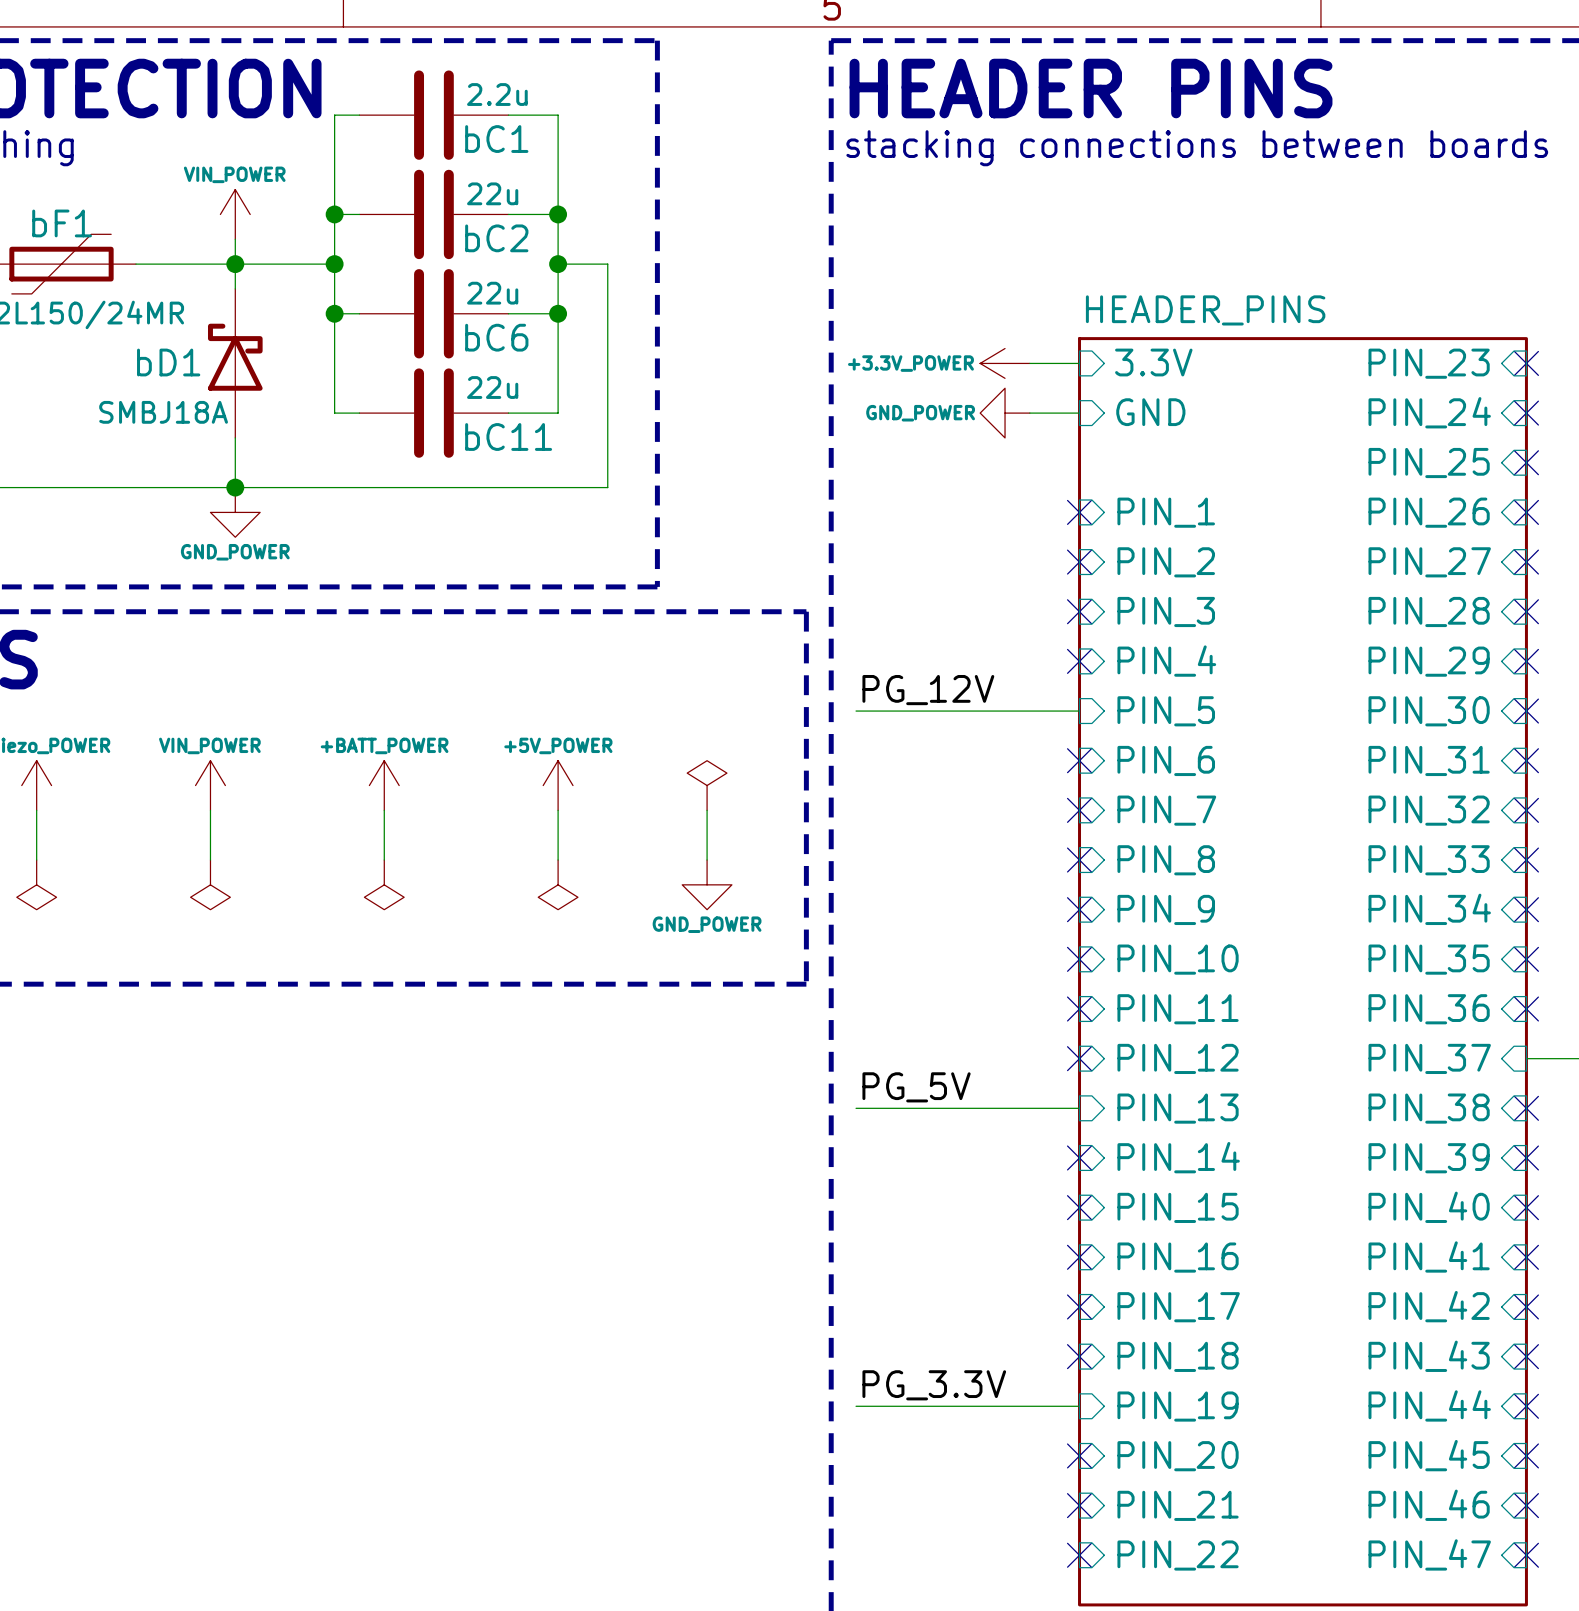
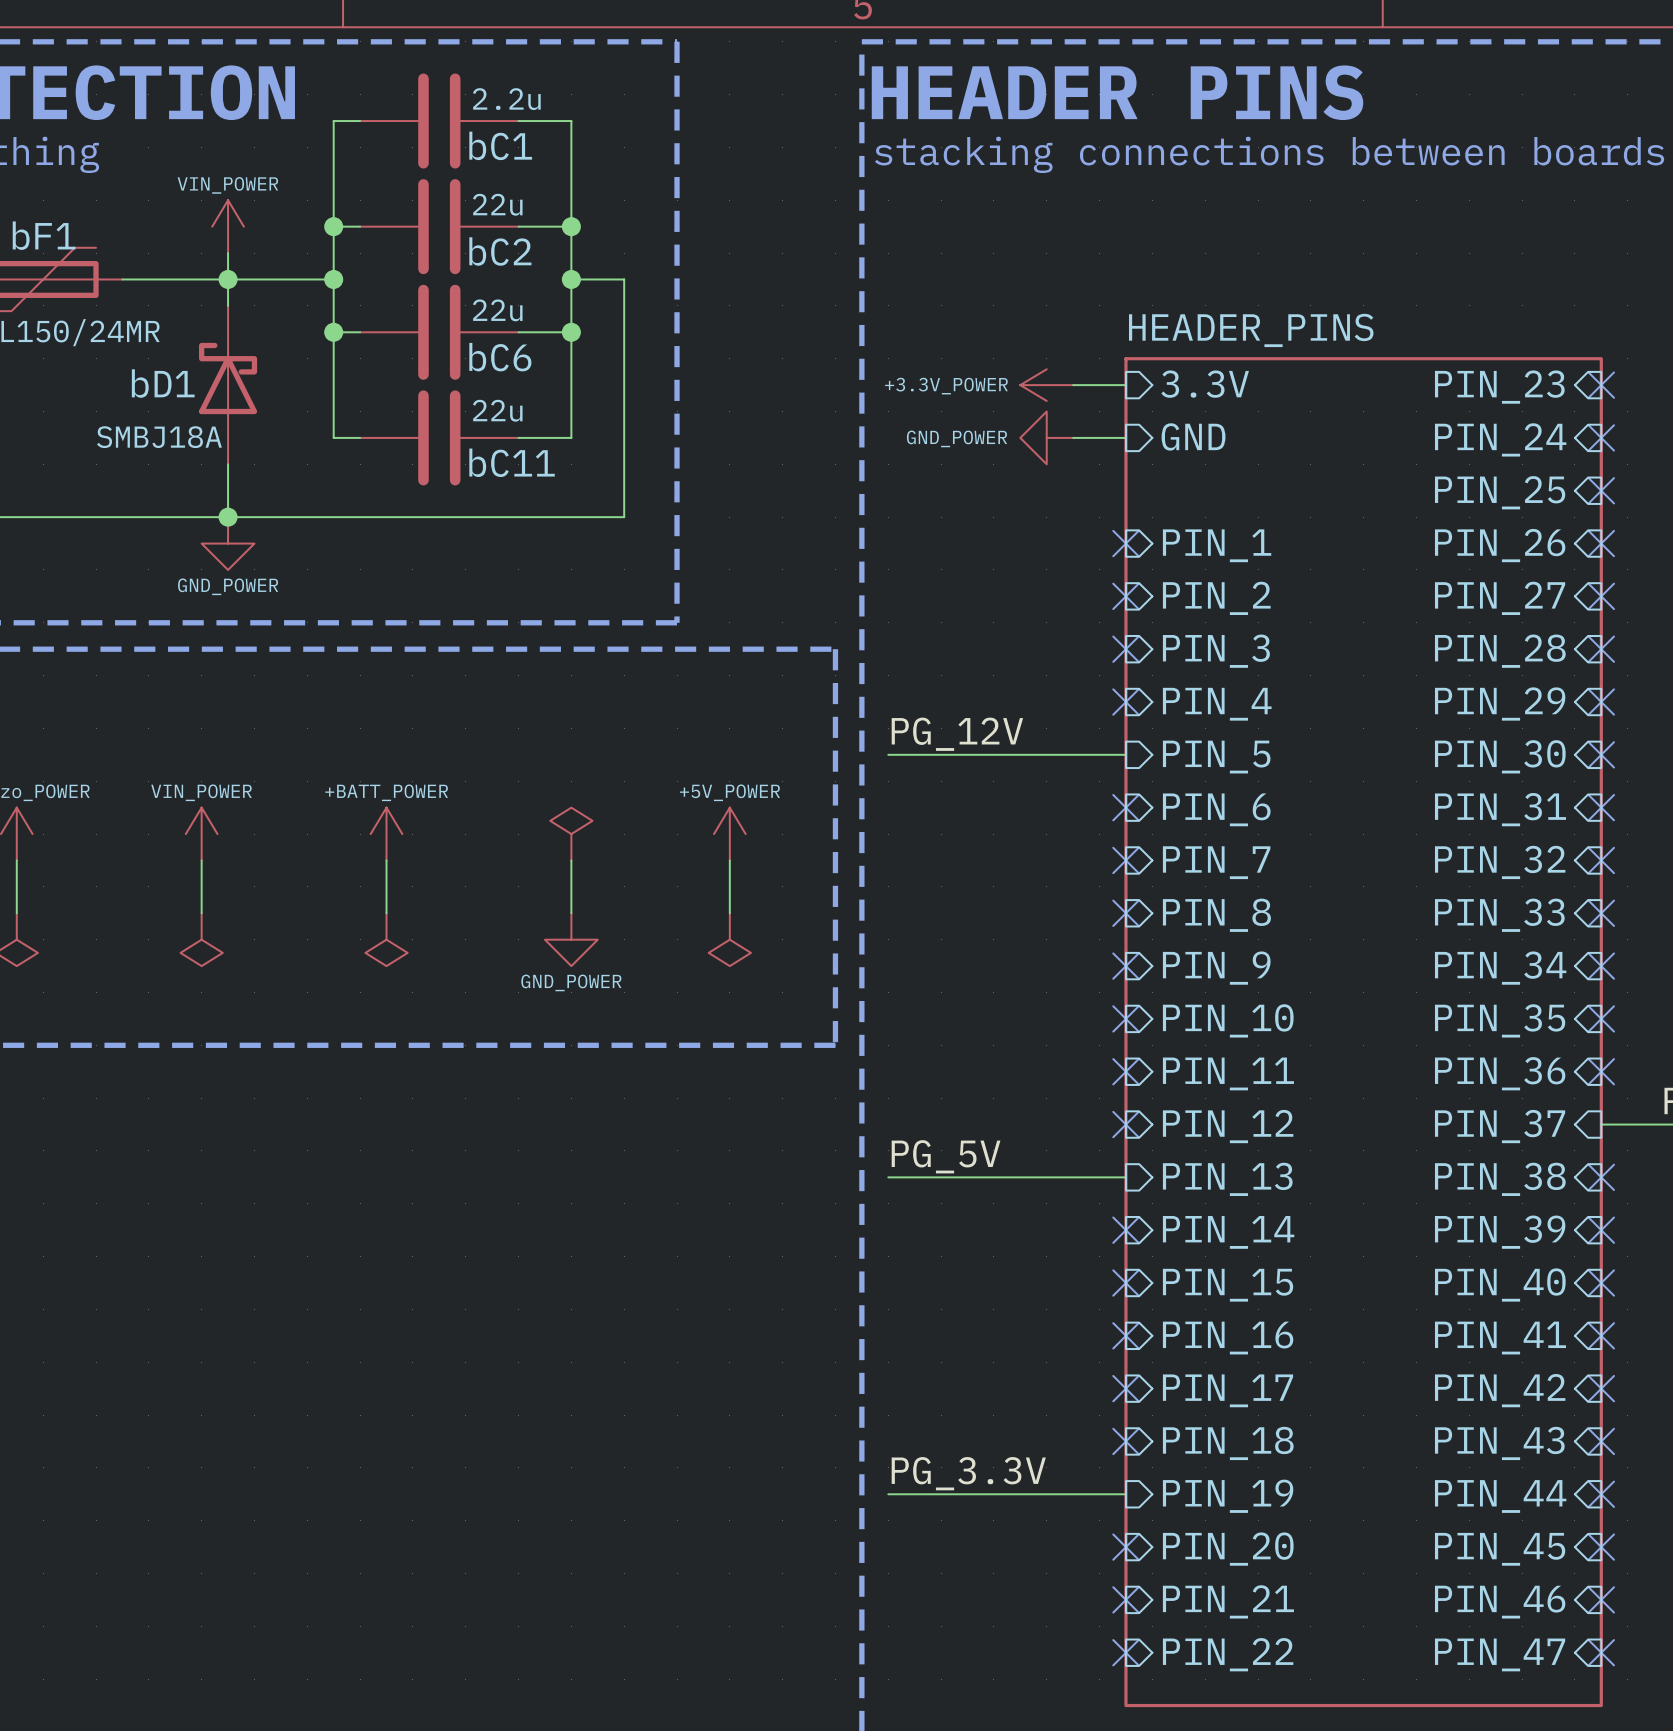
power symbol text: +5V_POWER (558, 745) -> none
power symbol text: none -> +5V_POWER (729, 792)
power symbol shape: [543, 760, 573, 811] -> [550, 807, 593, 861]
power symbol shape: [687, 760, 727, 811] -> [713, 807, 746, 861]
power symbol shape: [538, 860, 578, 910] -> [544, 913, 598, 967]
power symbol shape: [682, 860, 732, 910] -> [708, 913, 751, 967]
power symbol text: none -> GND_POWER (571, 982)
power symbol text: GND_POWER (707, 924) -> none

